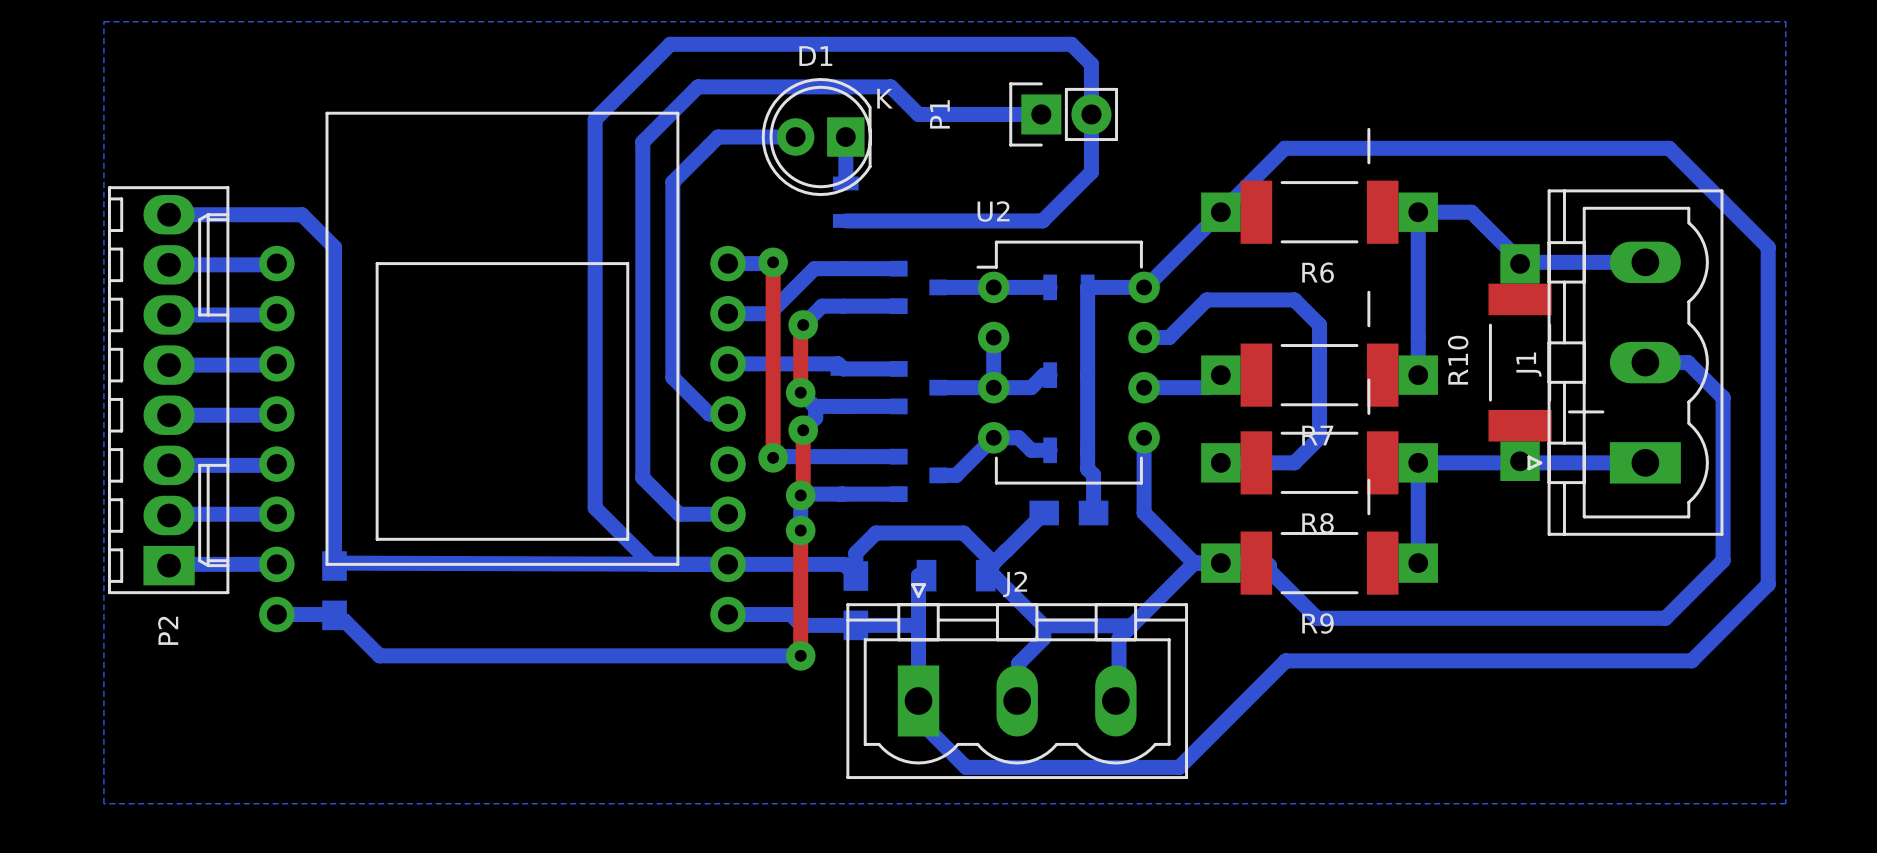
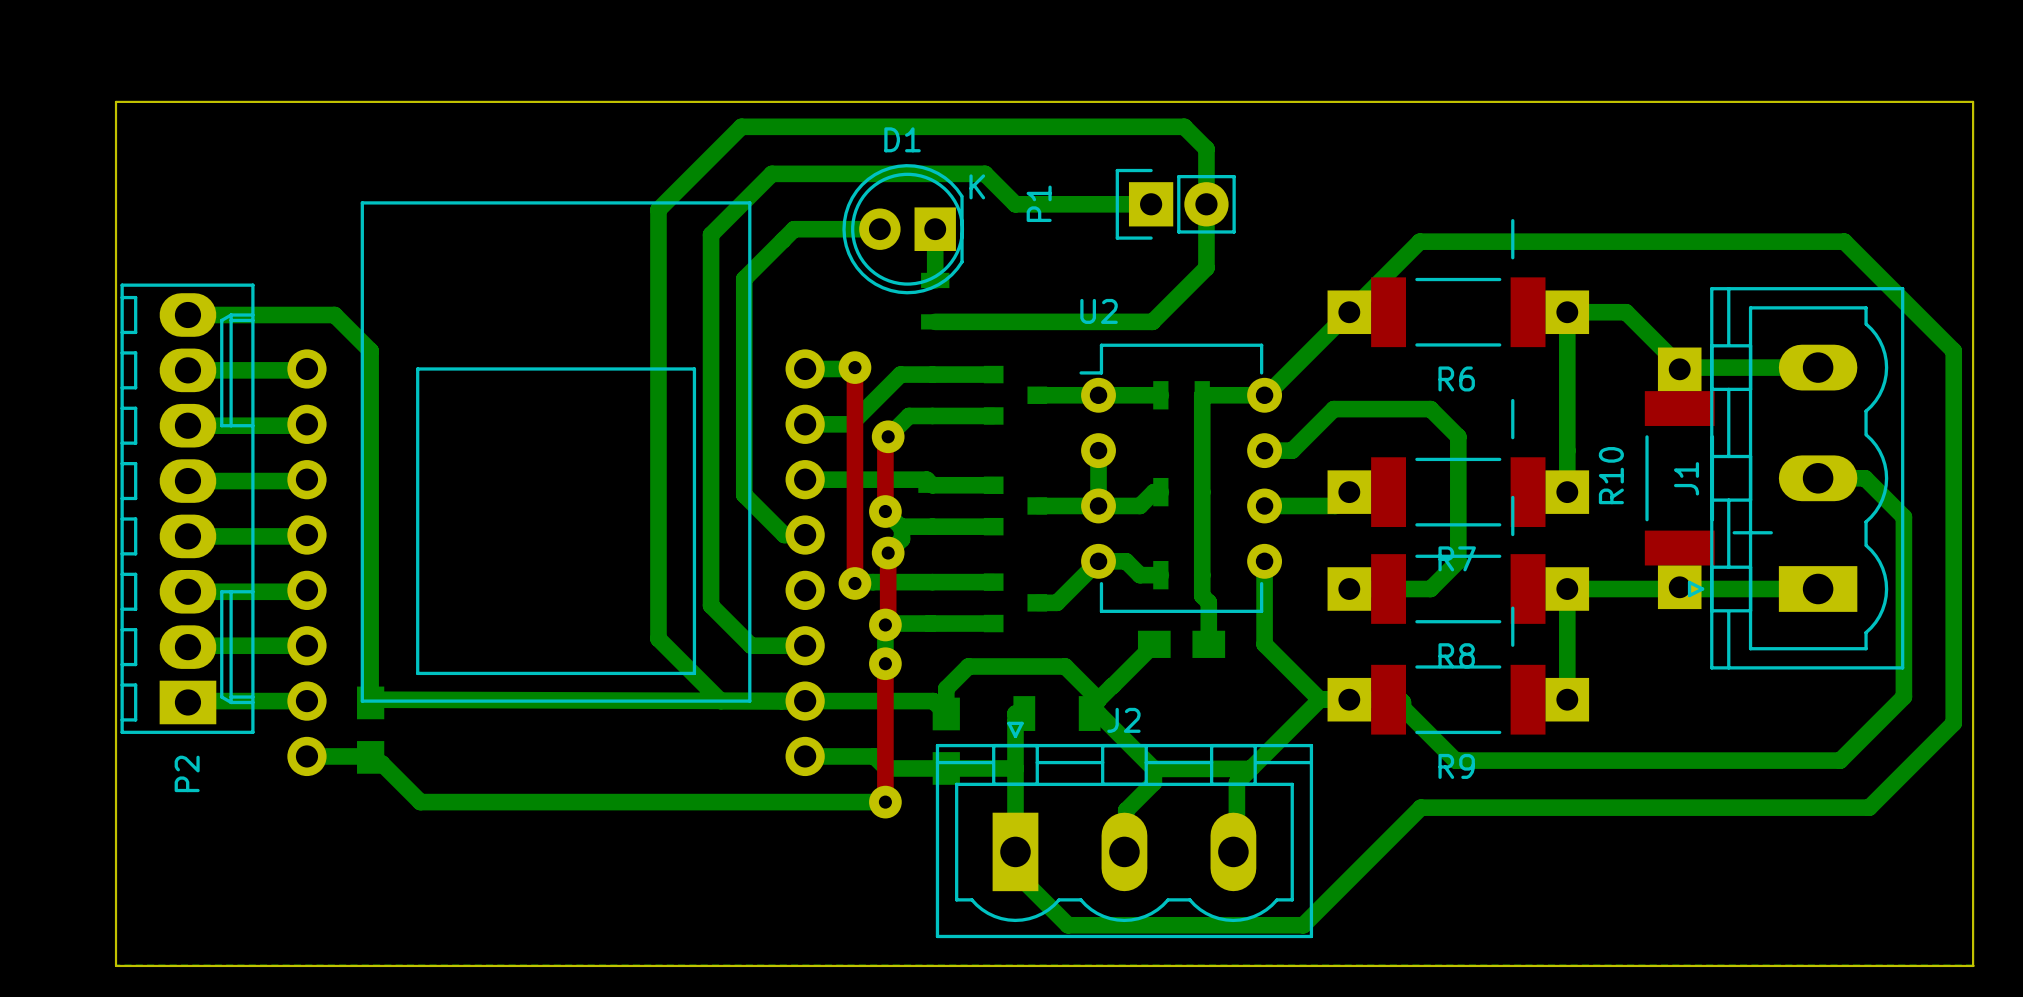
board edge: none -> (116, 965) (116, 101) (1973, 101) (1973, 965)
board edge: none -> (116, 965) (1973, 965)

